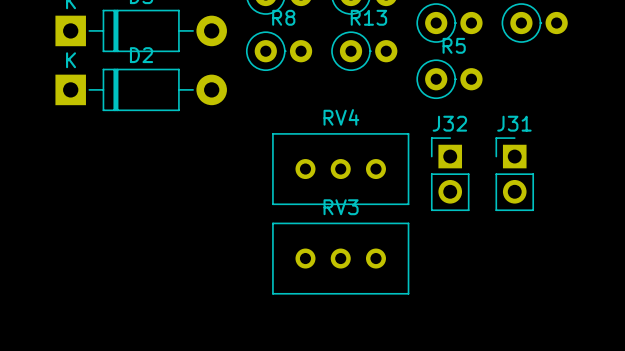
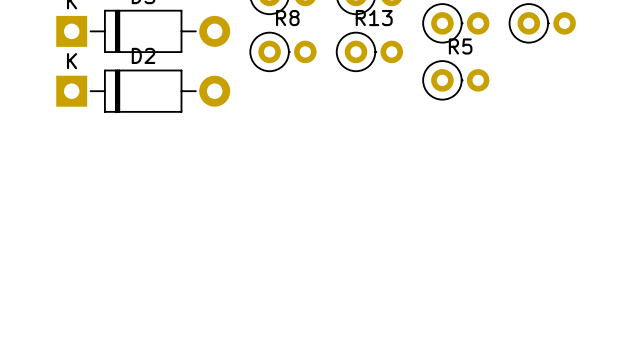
RV4: (340, 169) -> none
J32: (450, 174) -> none
J31: (514, 174) -> none
RV3: (340, 258) -> none

